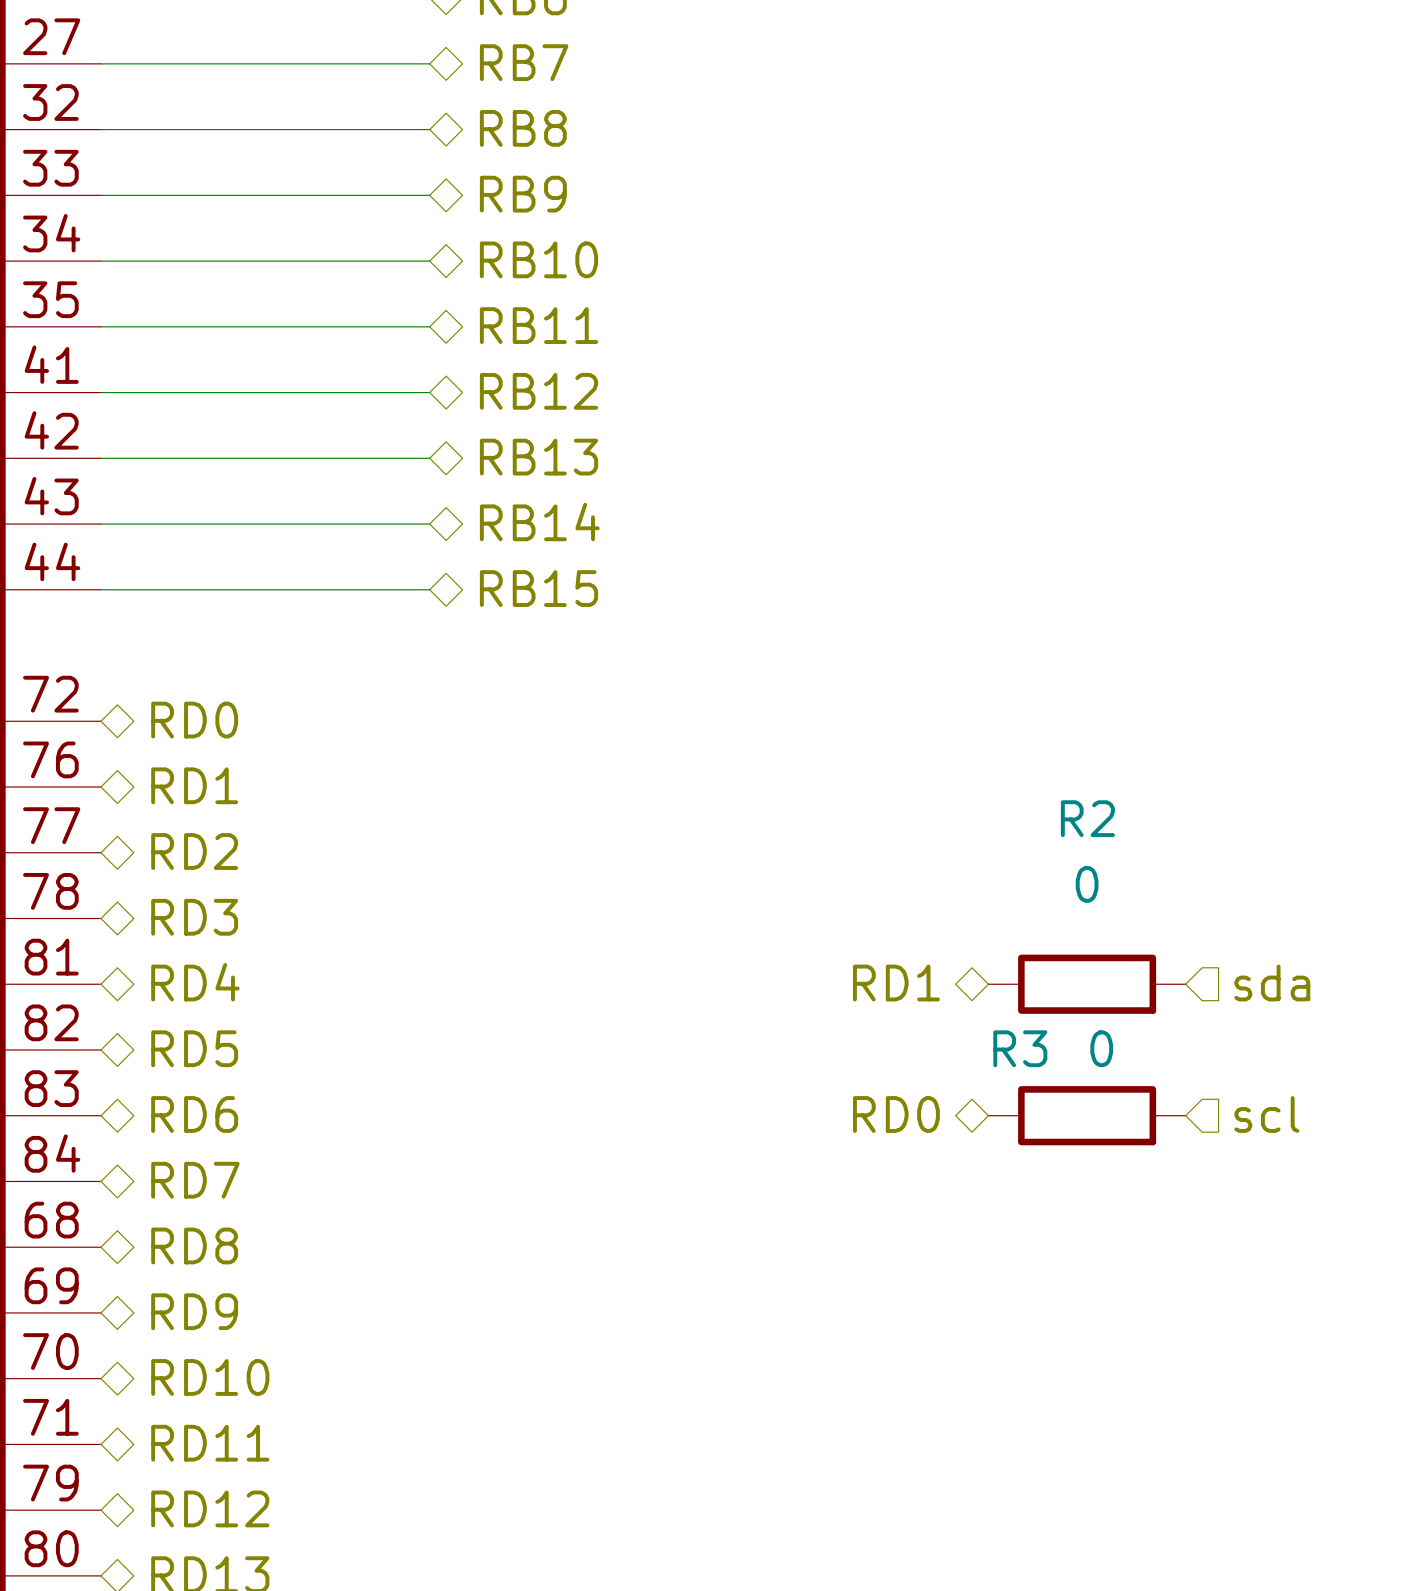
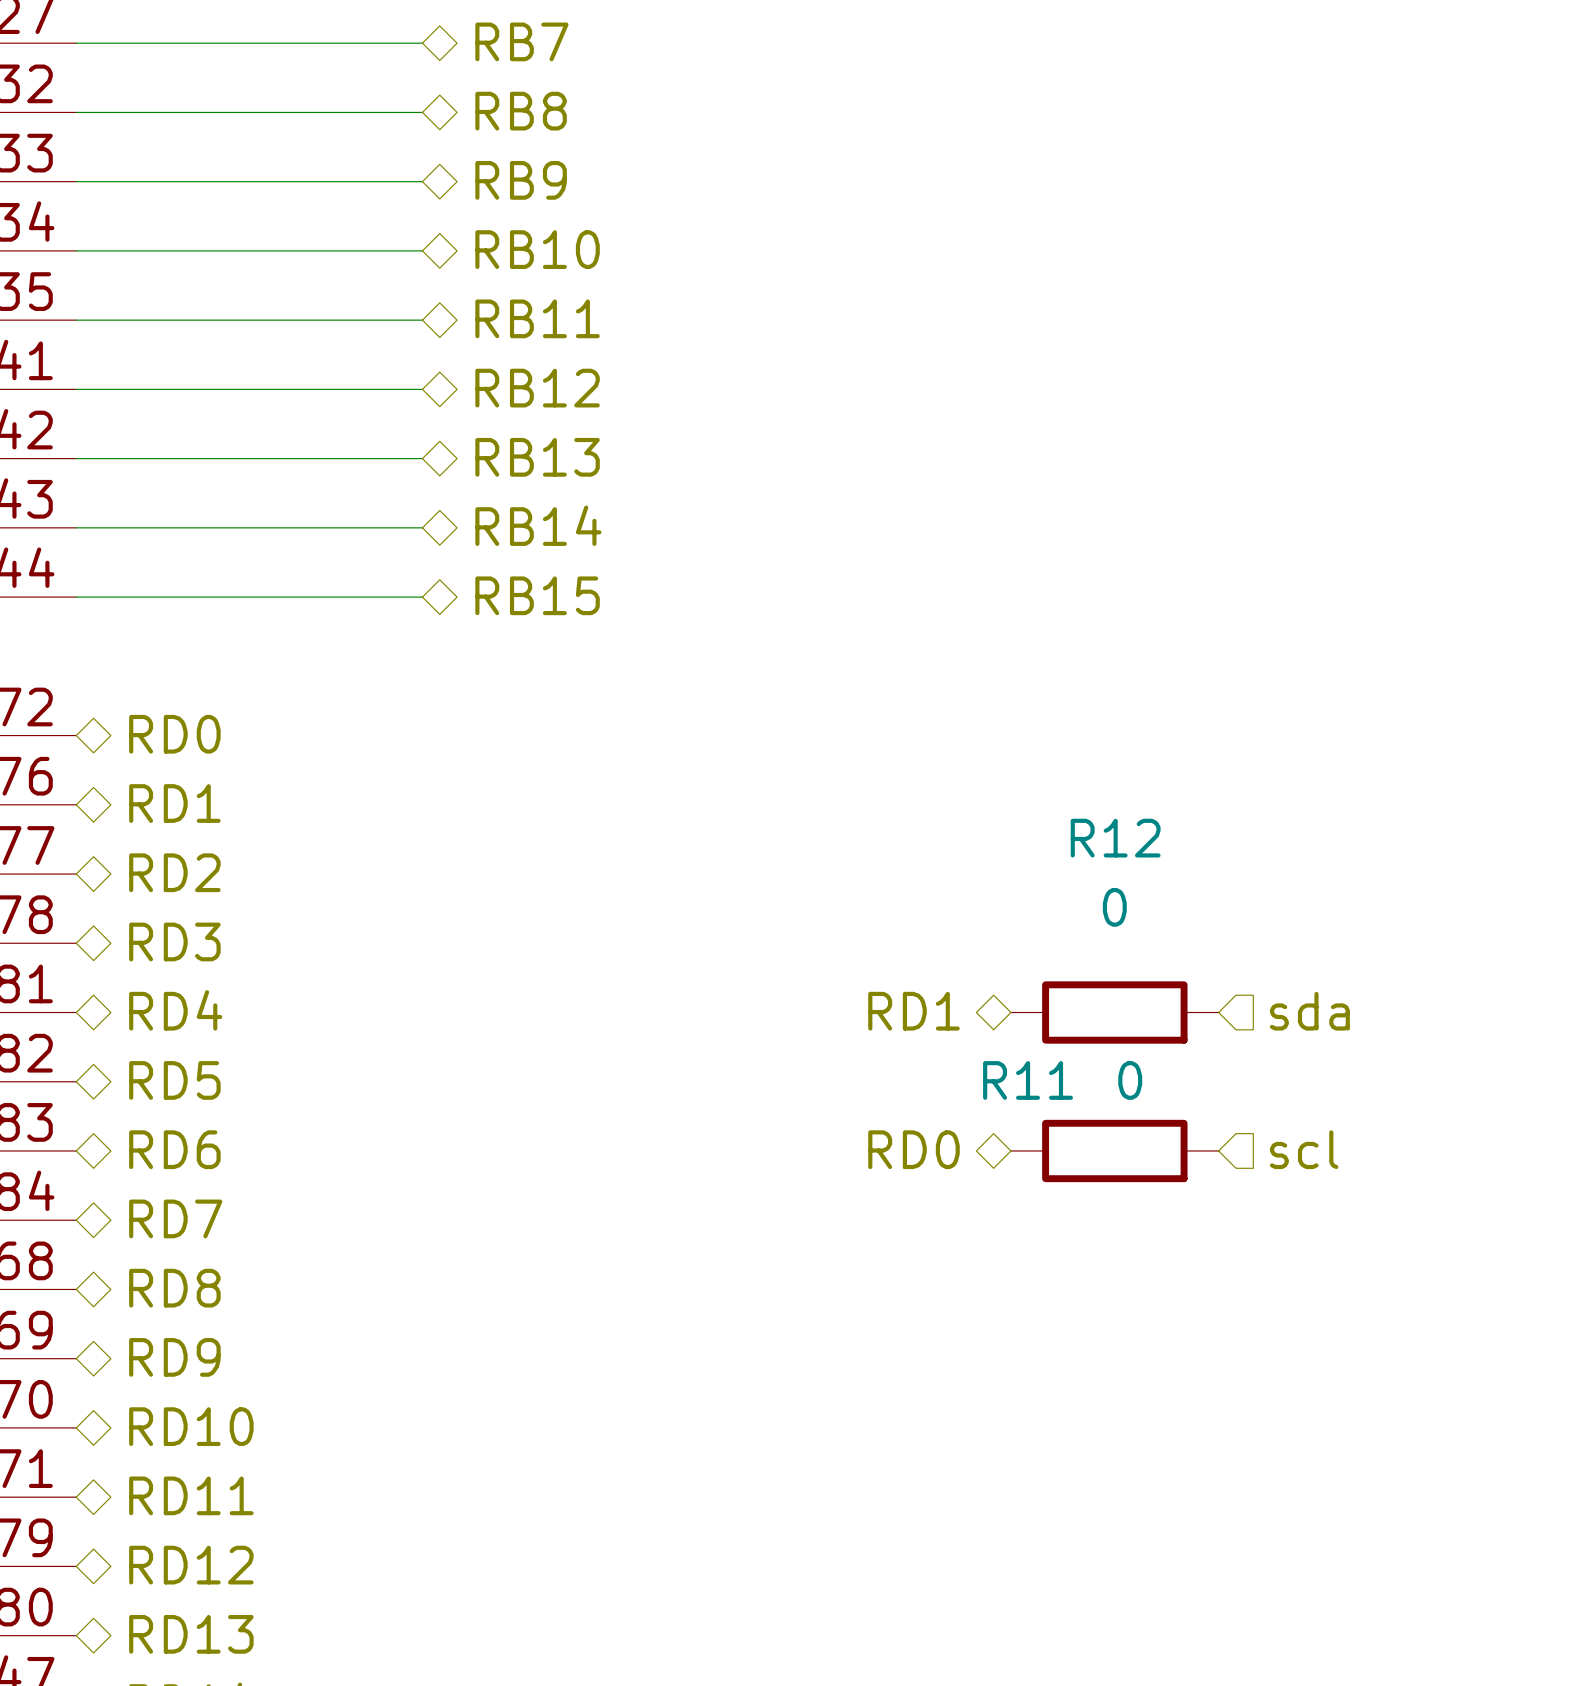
R2 name: R2 (1087, 818) -> R12 (1115, 838)
R3 name: R3 (1020, 1048) -> R11 (1028, 1080)

